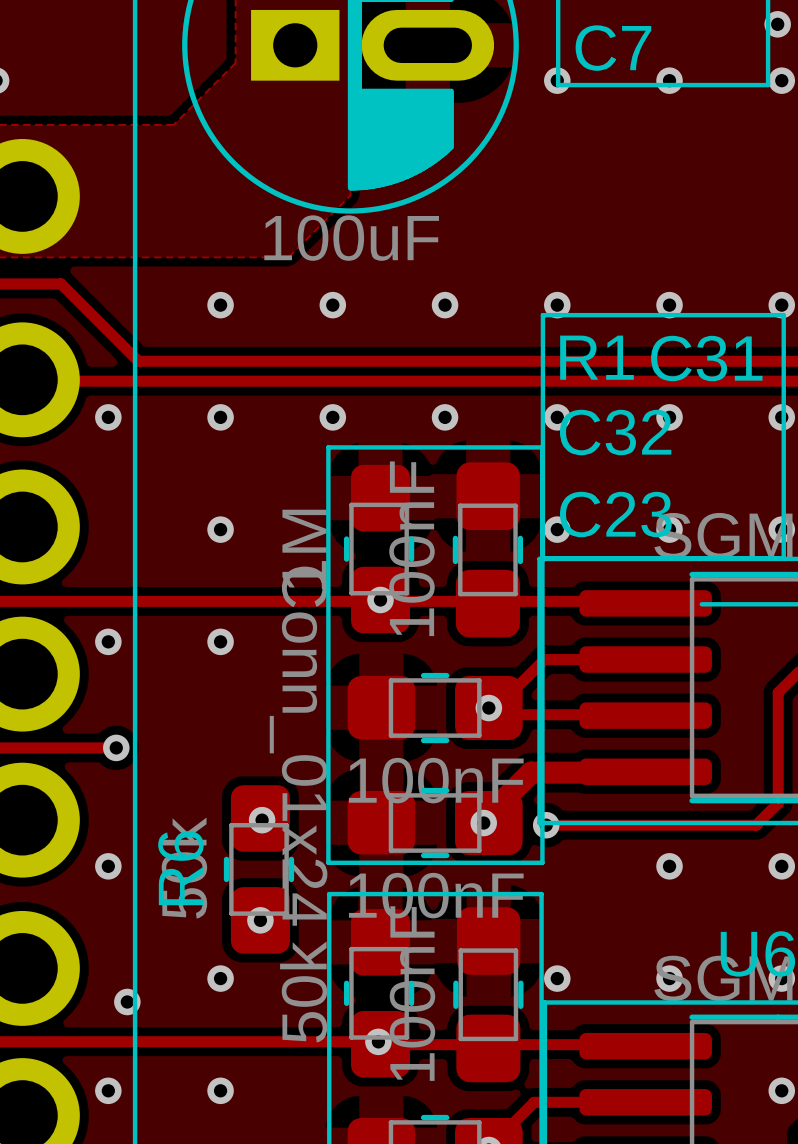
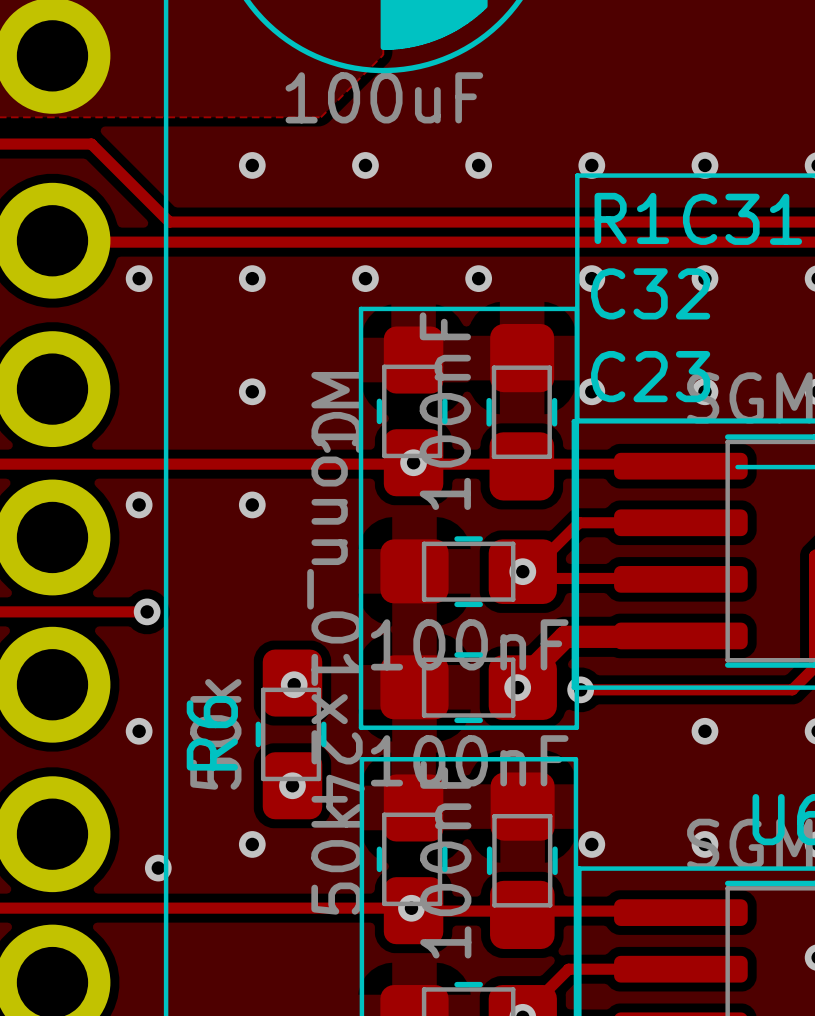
via: (108, 1090) -> none
via: (220, 1090) -> none

